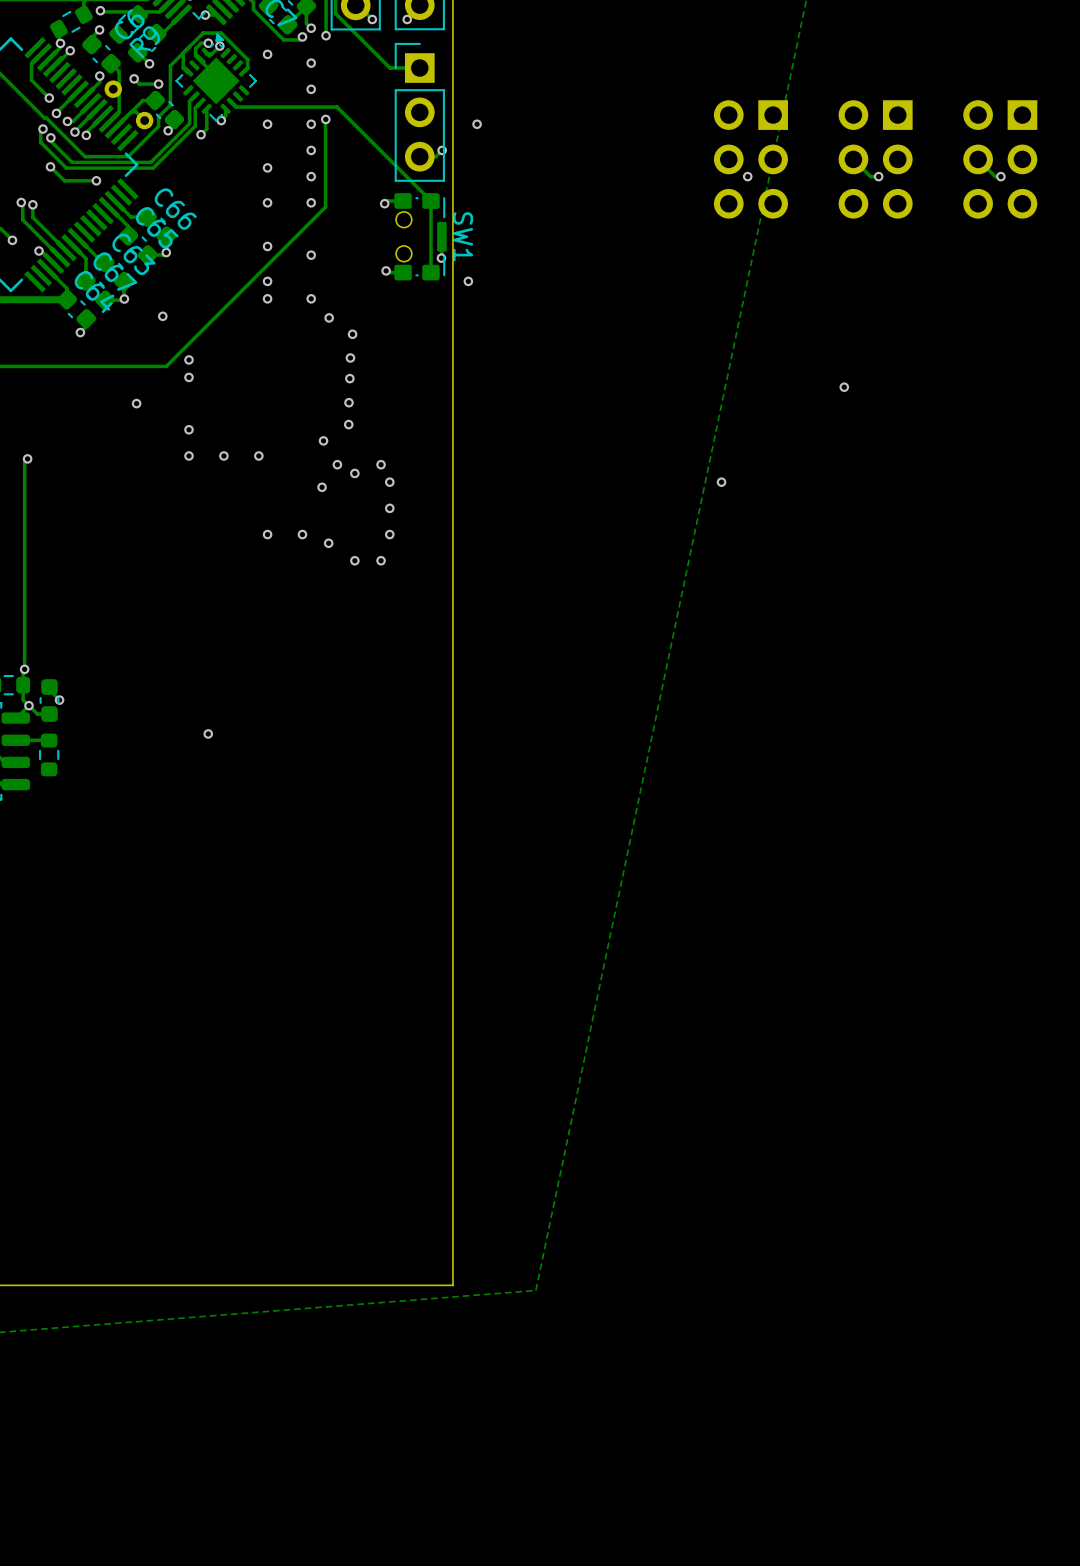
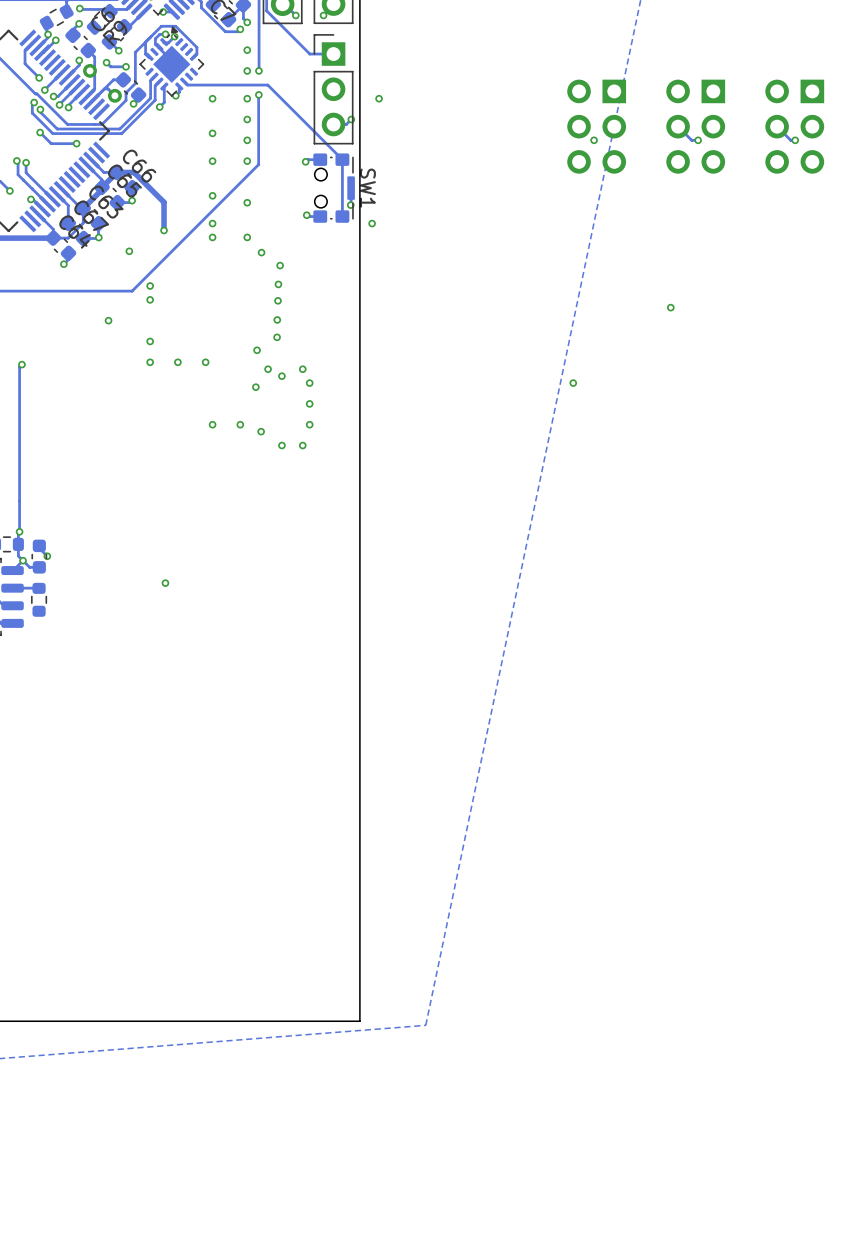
track: none -> (259, 28) (259, 70)
via: (326, 35) -> none
via: (267, 54) -> none
via: none -> (258, 70)
track: none -> (164, 230) (164, 202) (134, 172) (116, 172) (83, 208) (83, 223) (68, 238) (53, 238)
via: none -> (164, 230)

